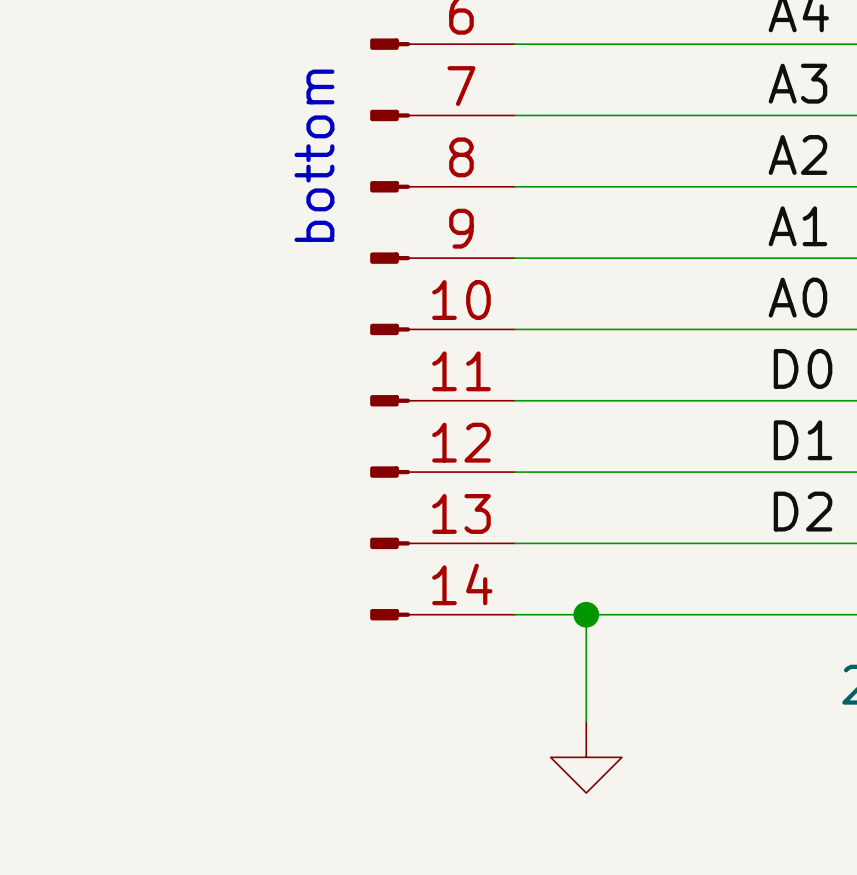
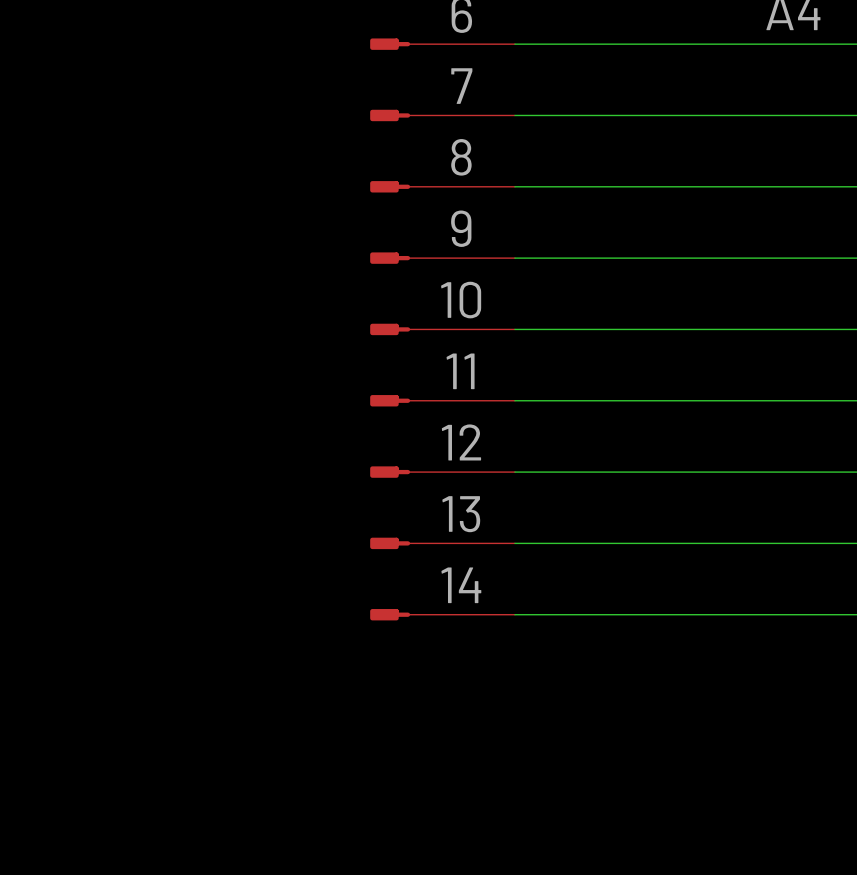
label: A3 (797, 83) -> none
label: A2 (797, 154) -> none
text: bottom (314, 155) -> none
label: A1 (797, 226) -> none
label: A0 (797, 297) -> none
label: D0 (803, 368) -> none
label: D1 (803, 440) -> none
label: D2 (803, 511) -> none
wire: (586, 614) (586, 721) -> none
junction: (586, 614) -> none
power symbol: (586, 757) -> none

